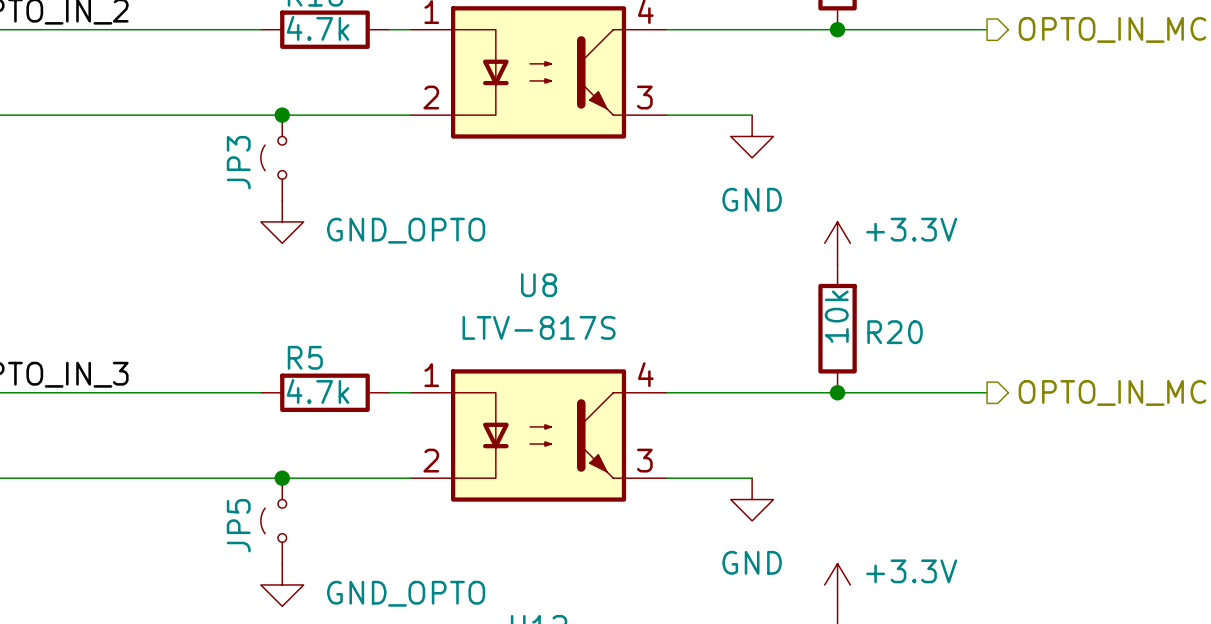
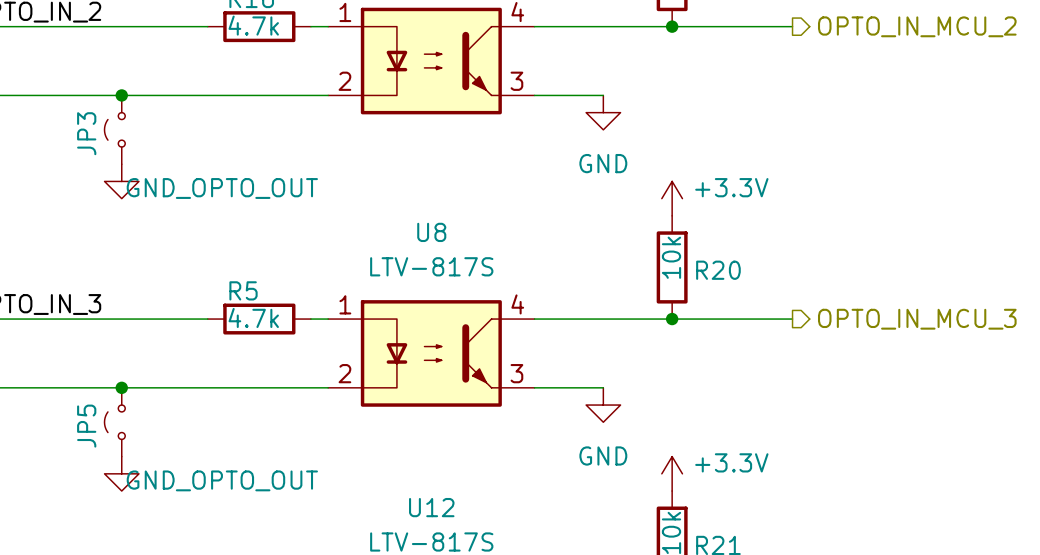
junction: none -> (121, 95)
junction: (282, 115) -> none
JP3 position: (273, 157) -> (114, 129)
power symbol: none -> GND_OPTO_OUT (121, 181)
power symbol: GND_OPTO (282, 221) -> none
junction: none -> (121, 387)
junction: (282, 478) -> none
JP5 position: (273, 520) -> (114, 422)
power symbol: none -> GND_OPTO_OUT (121, 473)
power symbol: GND_OPTO (282, 584) -> none

